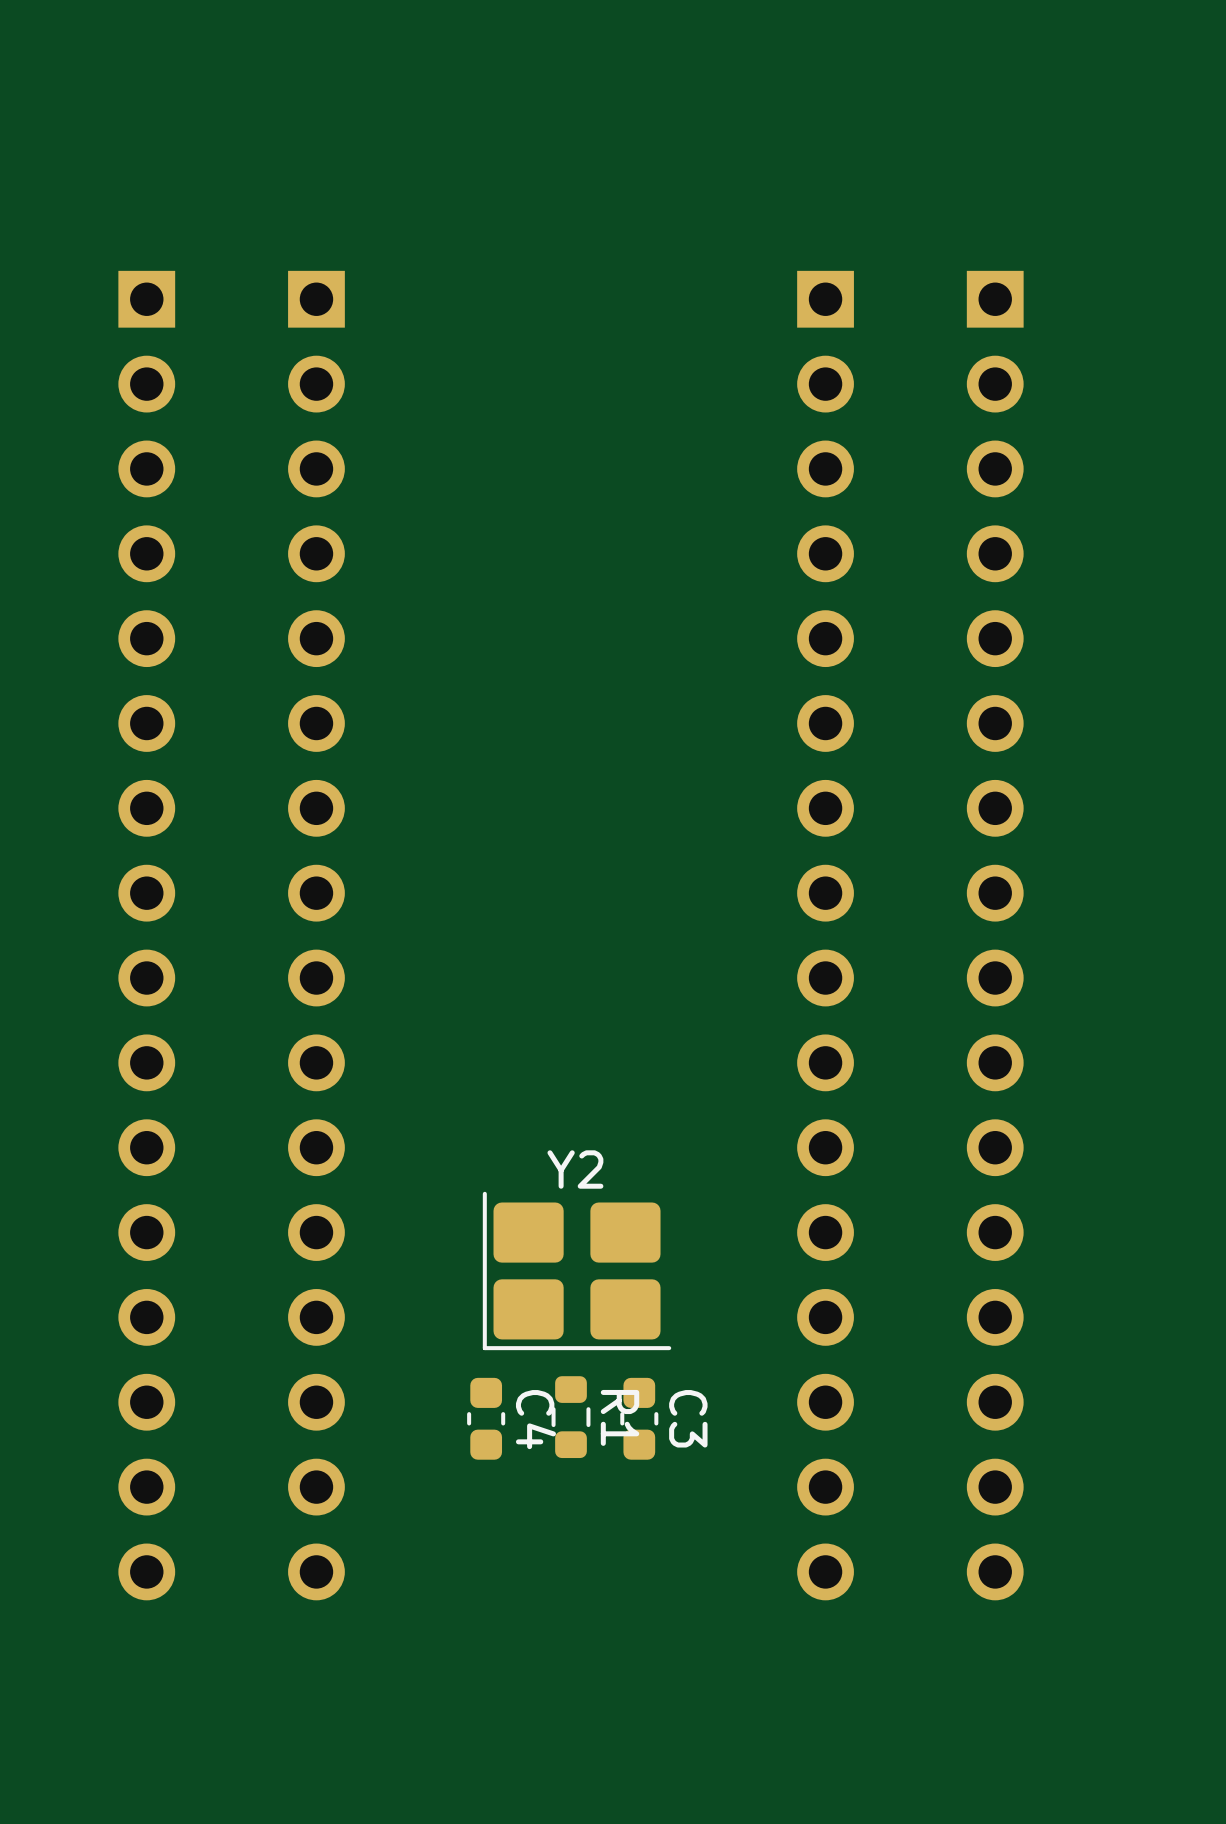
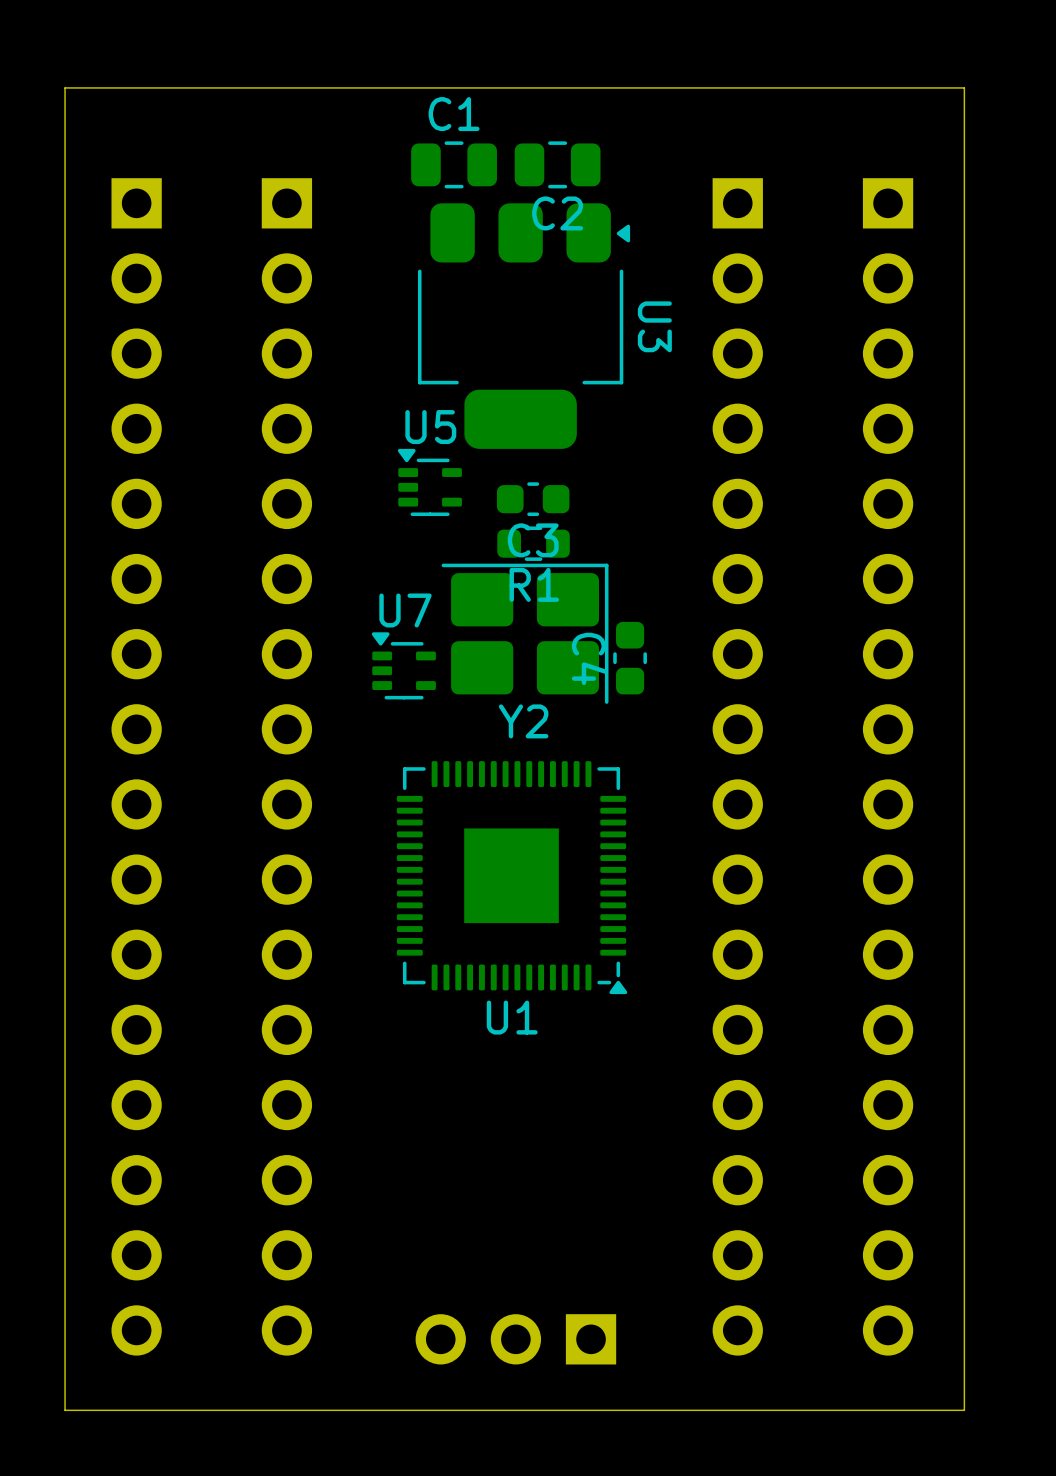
board edge: none -> (964, 87) (65, 87) (65, 1410) (964, 1410) (964, 87)
C1: none -> (454, 164)
C2: none -> (557, 164)
U3: none -> (524, 326)
U5: none -> (429, 482)
U7: none -> (403, 665)
U1: none -> (512, 877)
Y2 rotation: 0° (577, 1270) -> 180° (525, 633)
Y2 position: (577, 1270) -> (525, 633)
R1 rotation: 0° (571, 1417) -> 90° clockwise (533, 543)
R1 position: (571, 1417) -> (533, 543)
C4 position: (486, 1418) -> (630, 658)
C3 rotation: 0° (639, 1418) -> 90° clockwise (533, 499)
C3 position: (639, 1418) -> (533, 499)
C4 name position: C4 (535, 1419) -> C4 (589, 658)
part: none -> (515, 1339)

